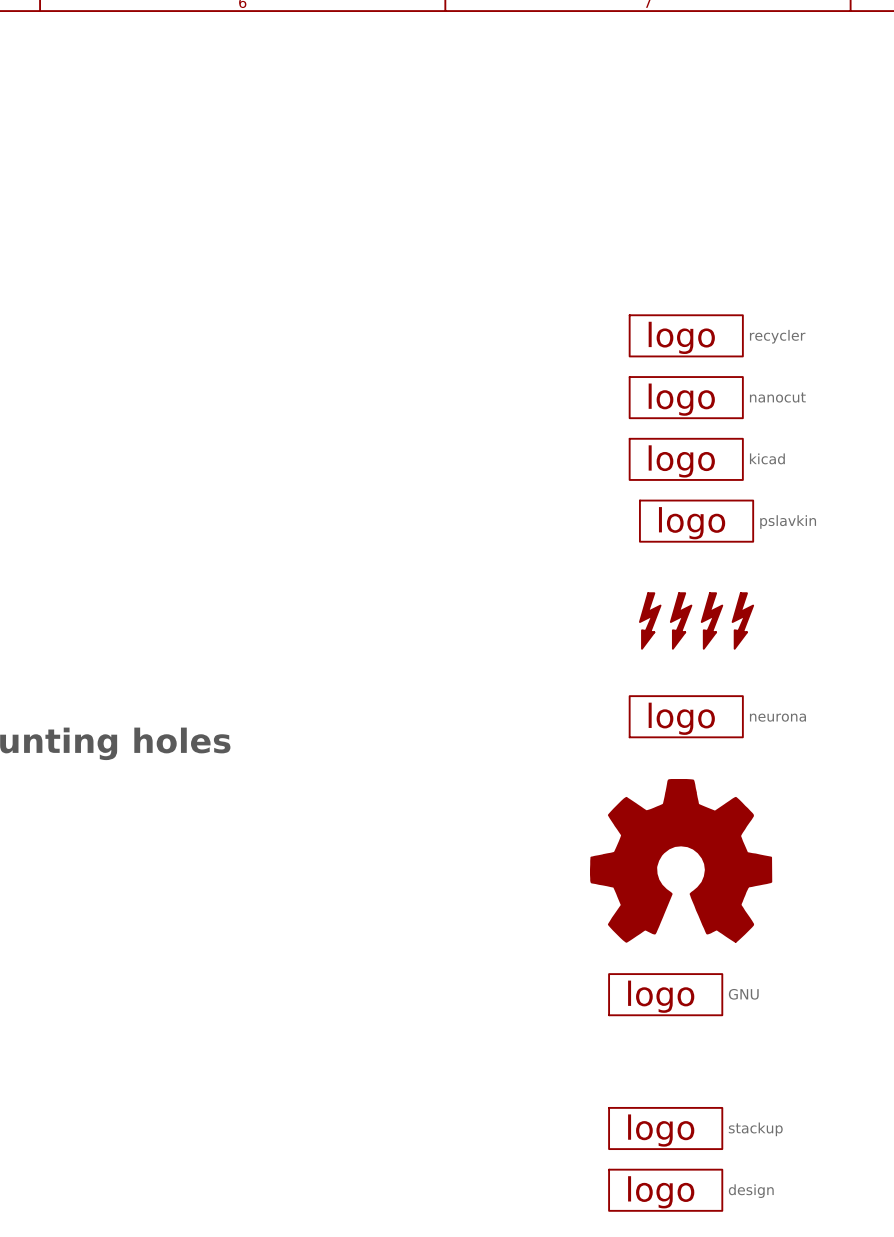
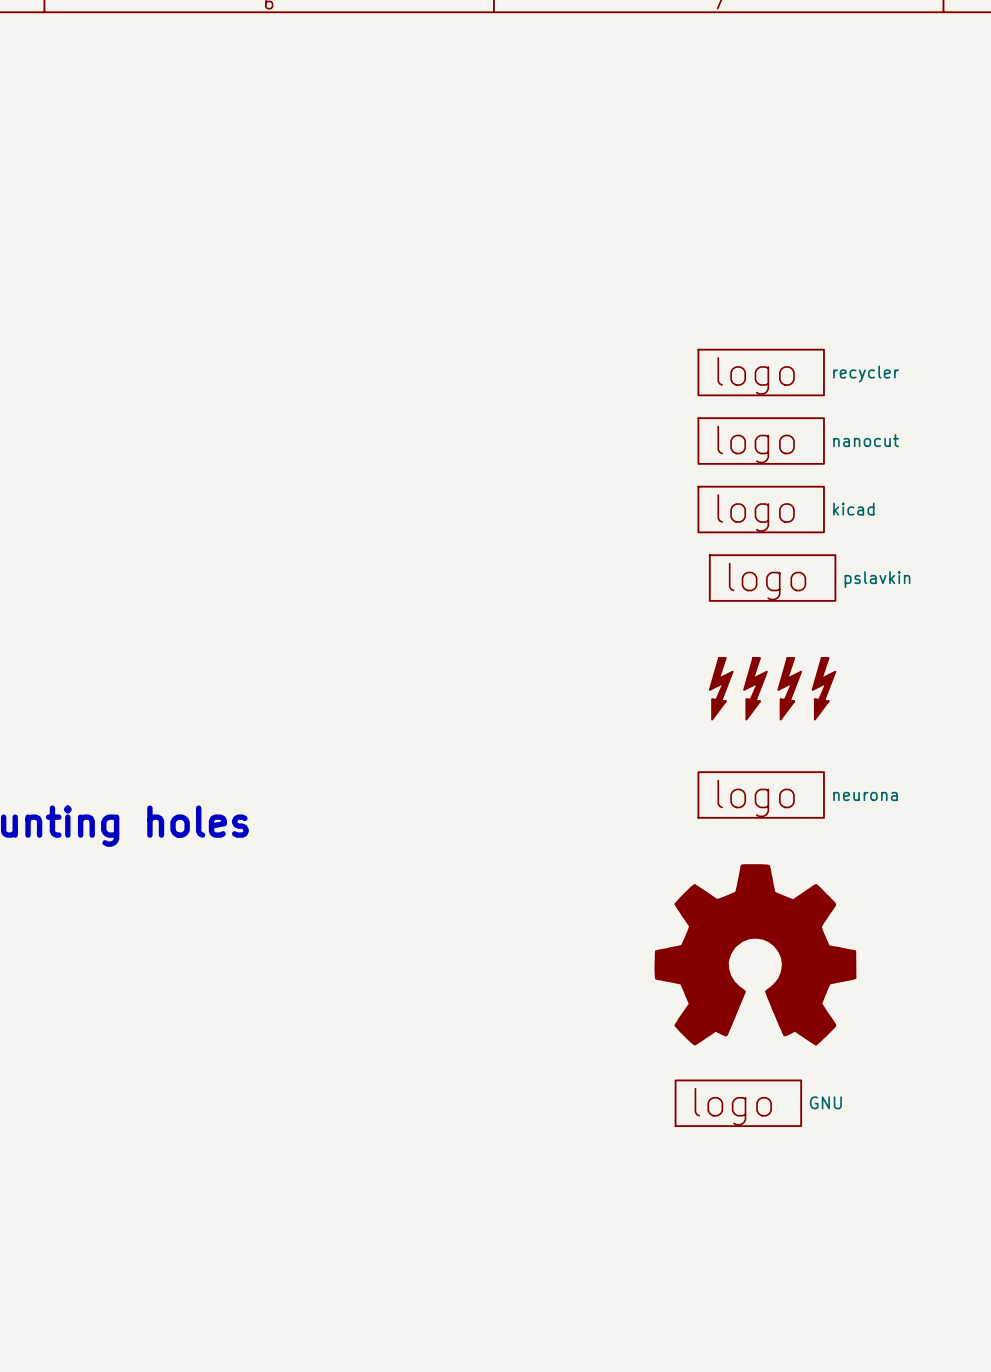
part: stackup (665, 1128) -> none
part: design (665, 1190) -> none

